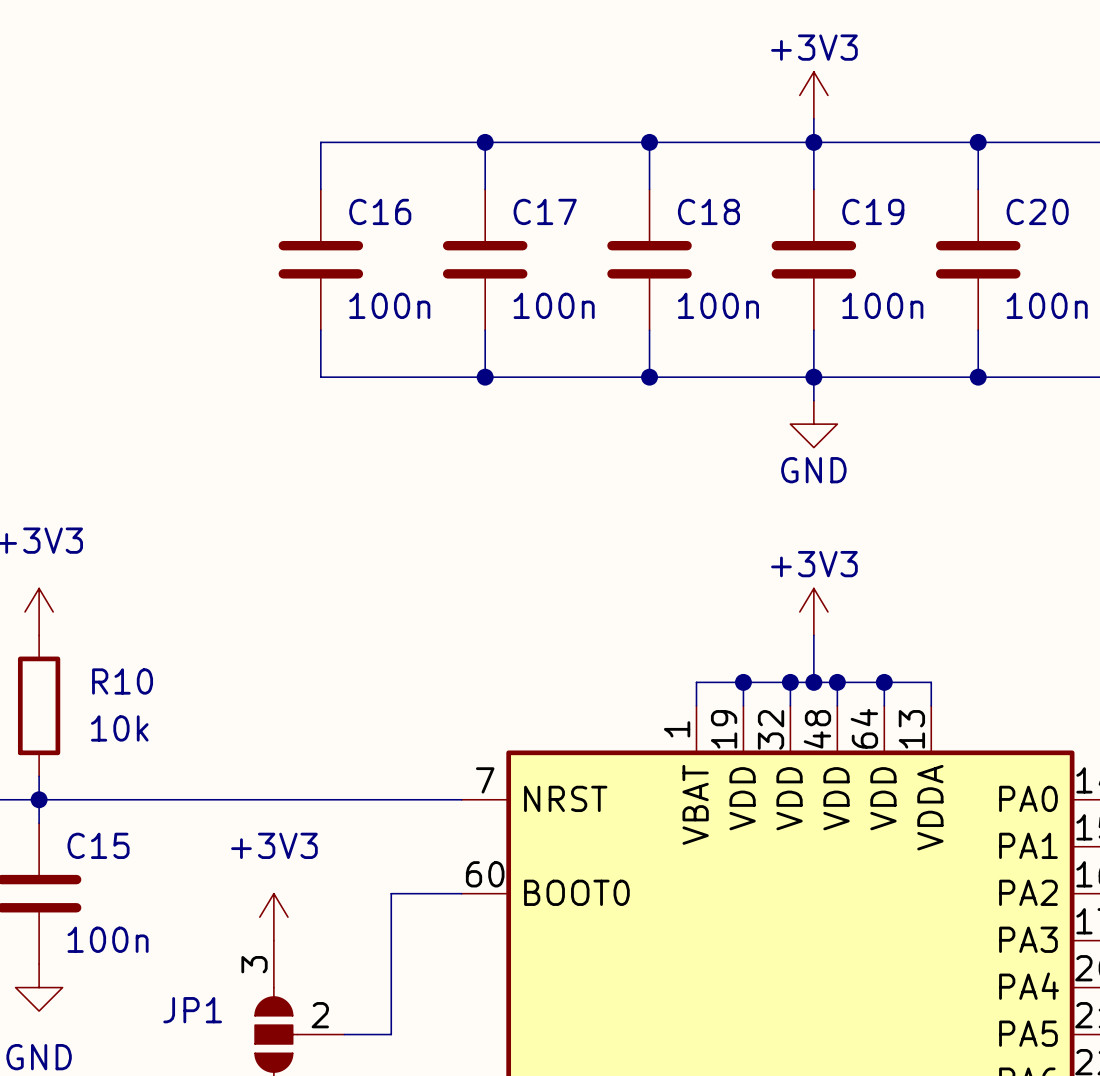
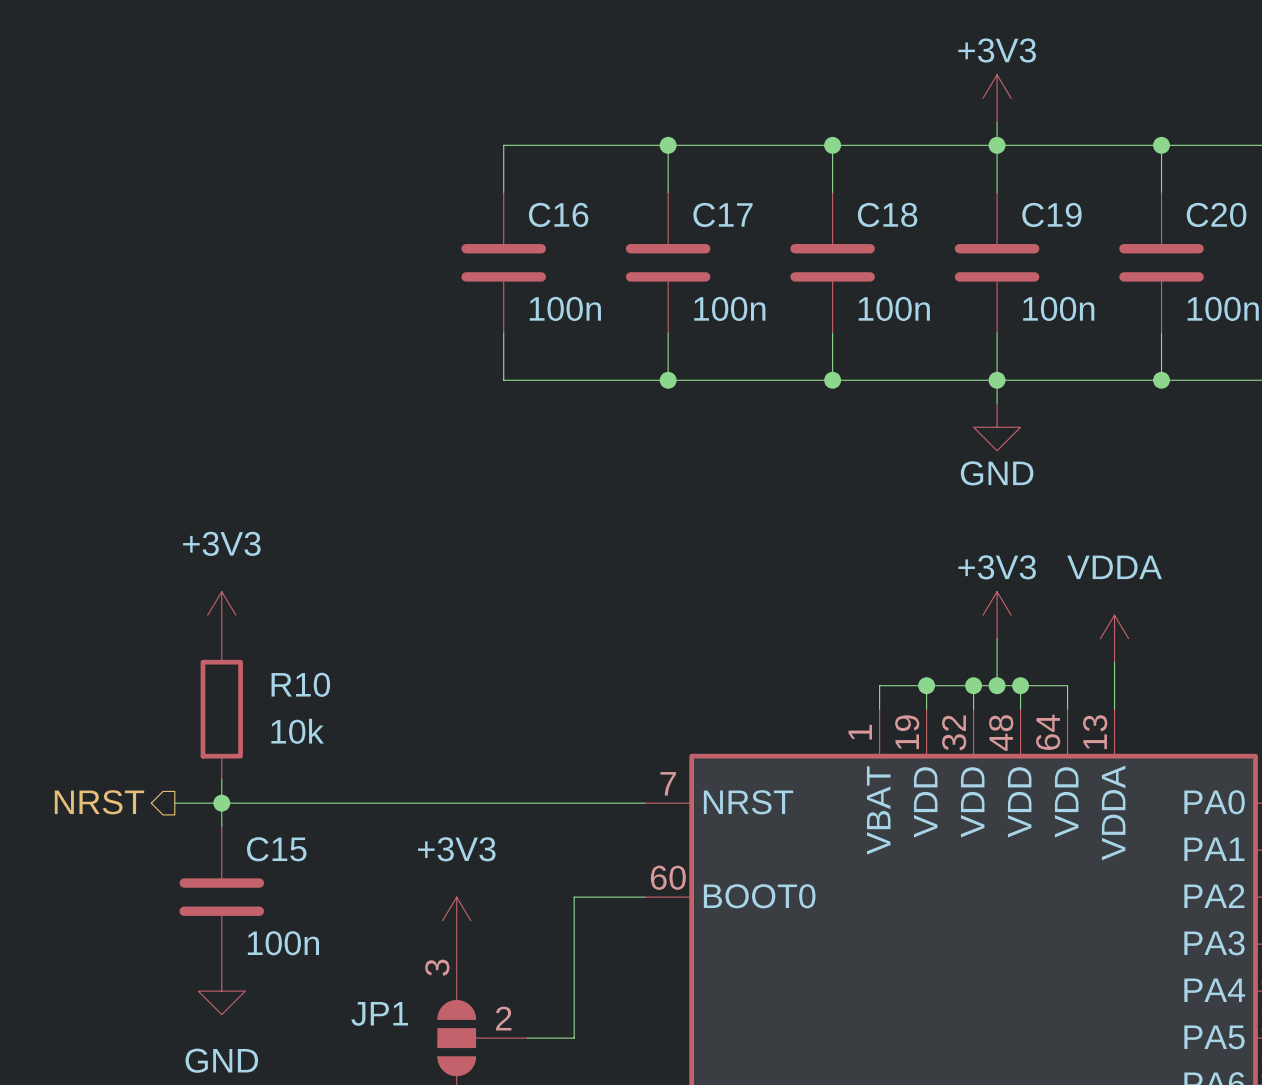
power symbol: none -> VDDA (1114, 638)
wire: (884, 682) (931, 682) -> (1114, 662) (1114, 685)
junction: (884, 682) -> none

